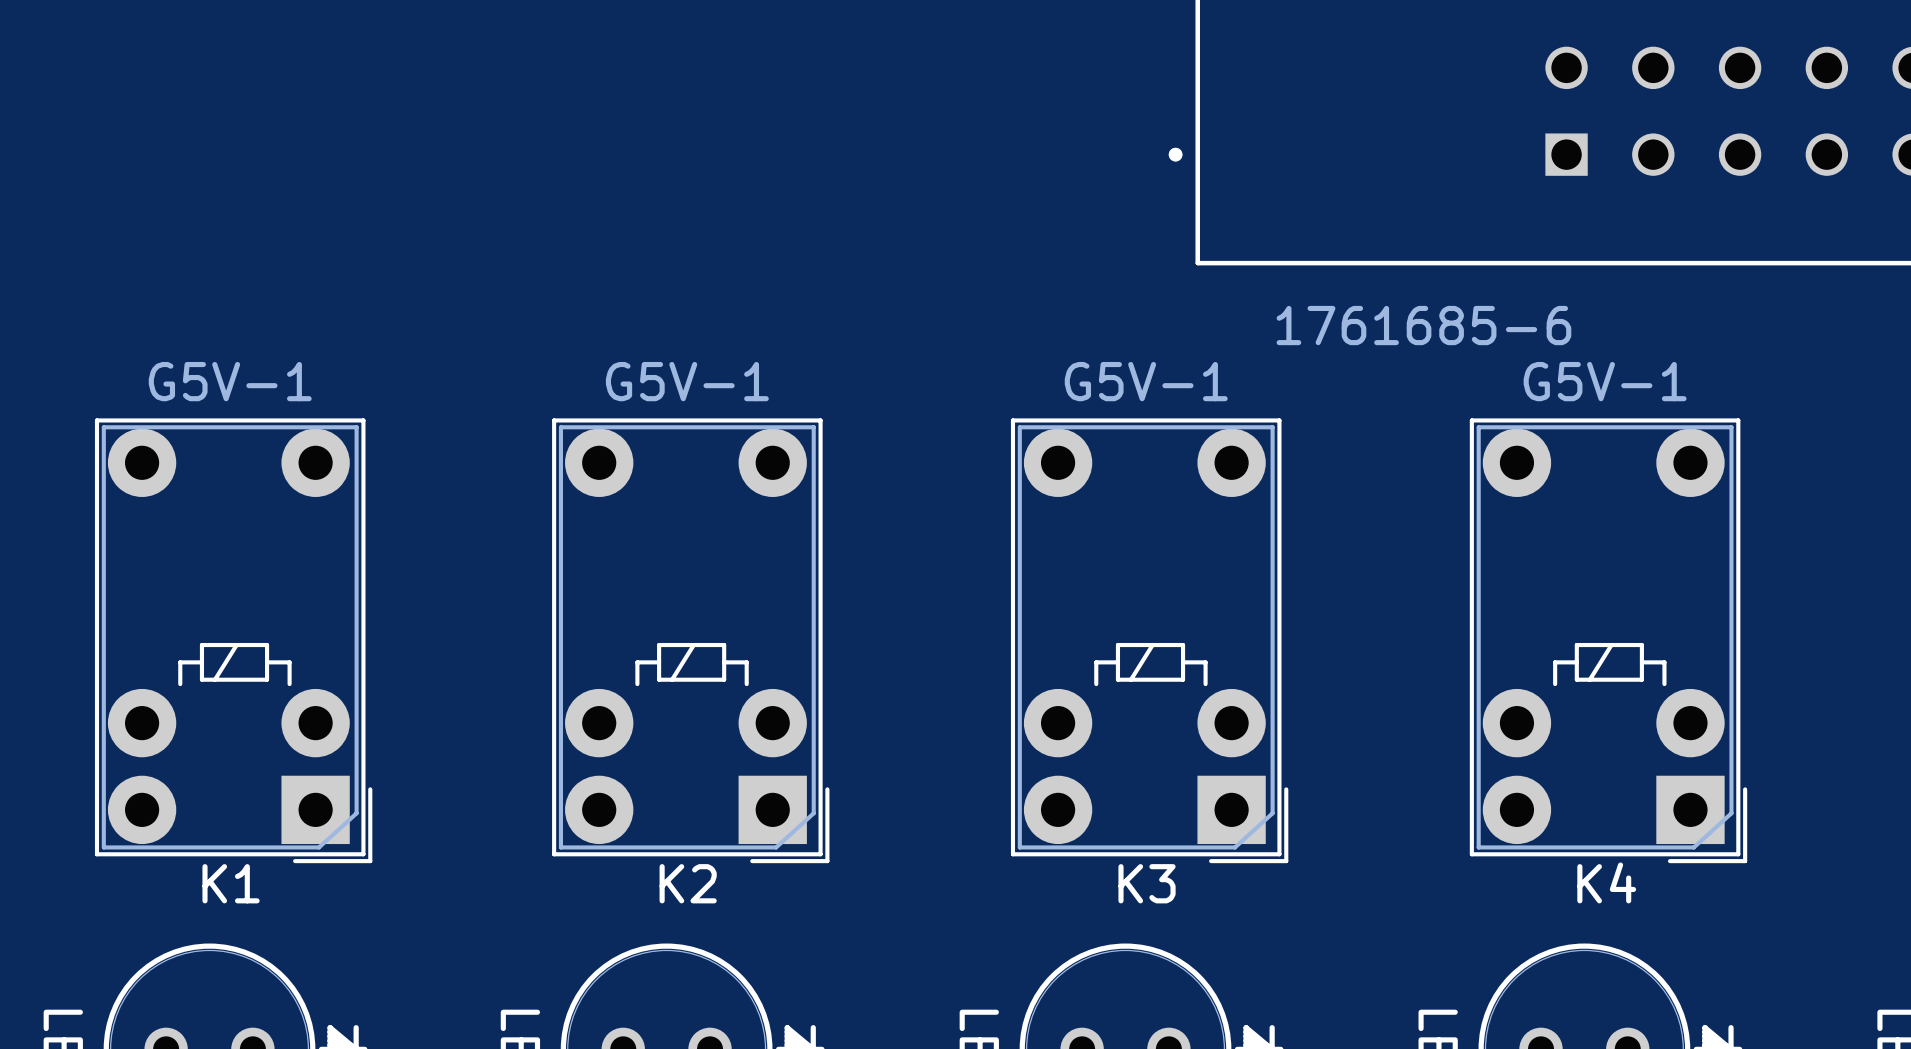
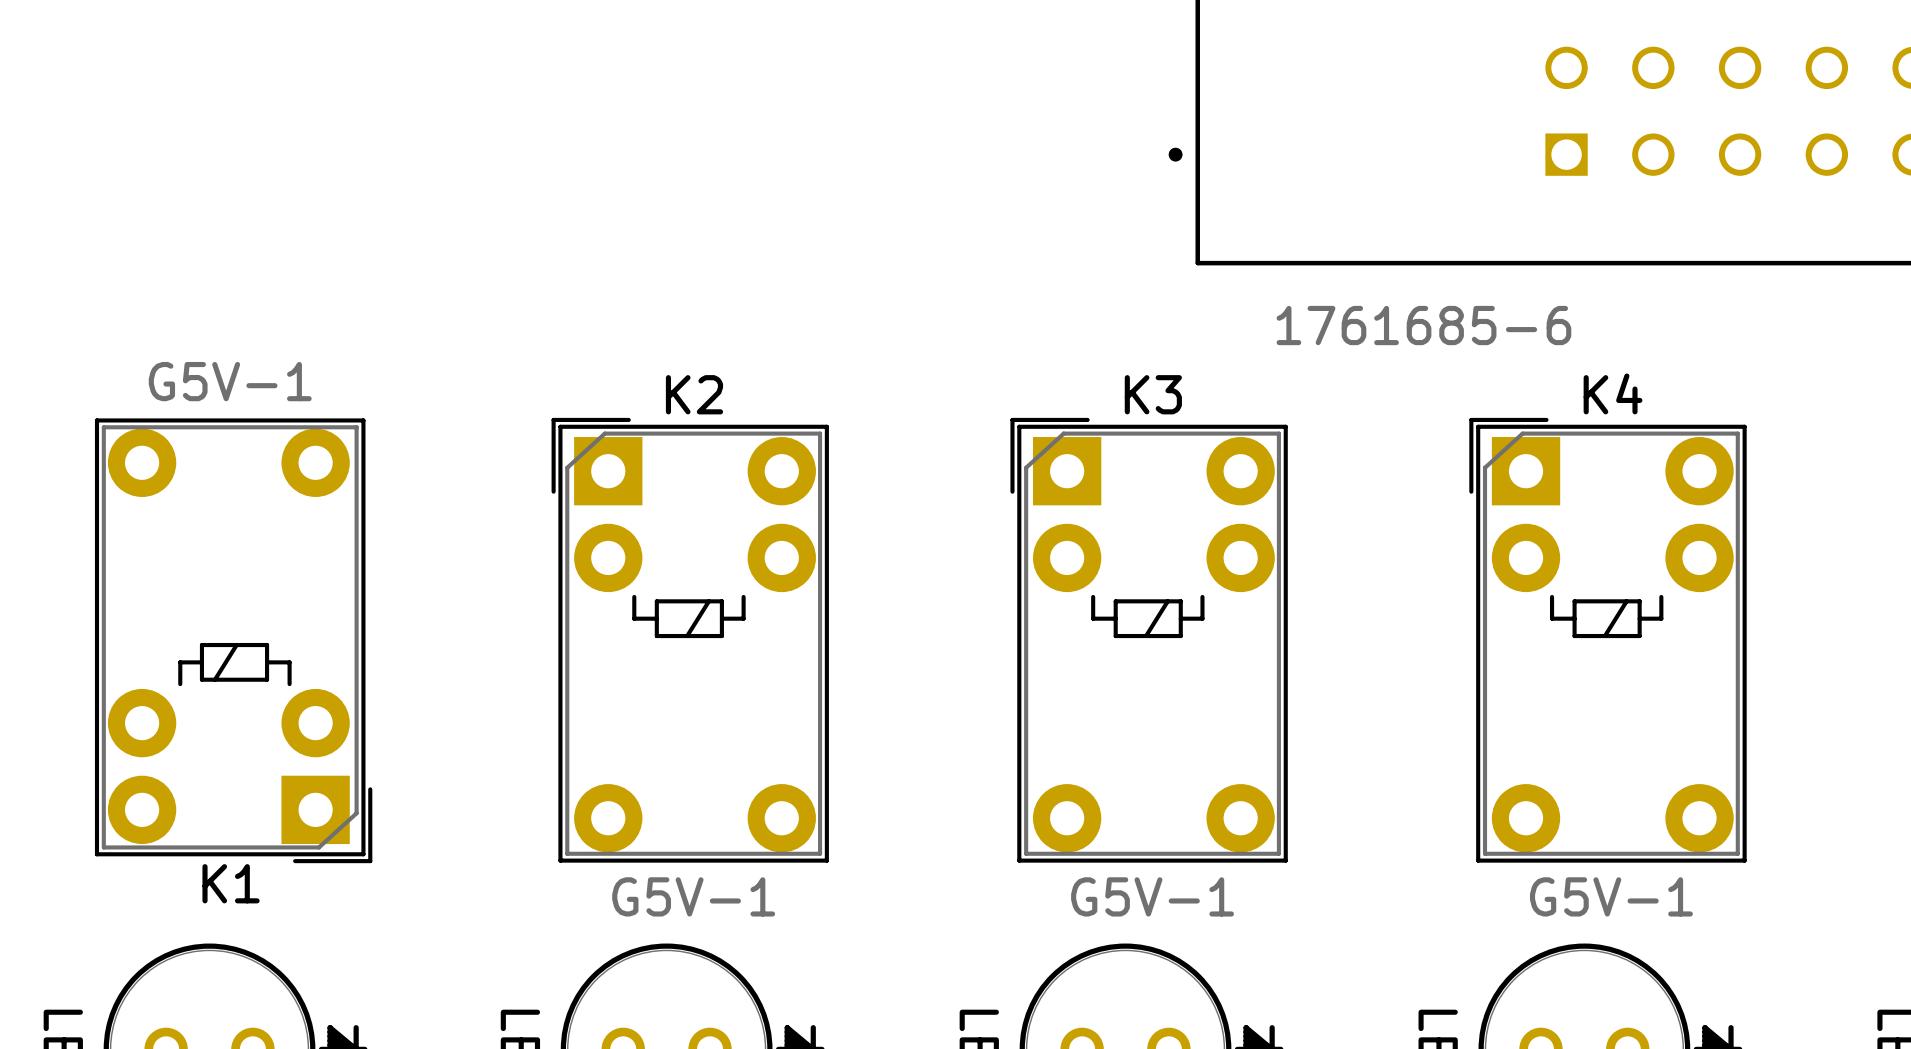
K2 rotation: 0° (690, 640) -> 180° (690, 640)
K3 rotation: 0° (1149, 640) -> 180° (1149, 640)
K4 rotation: 0° (1608, 640) -> 180° (1607, 640)

